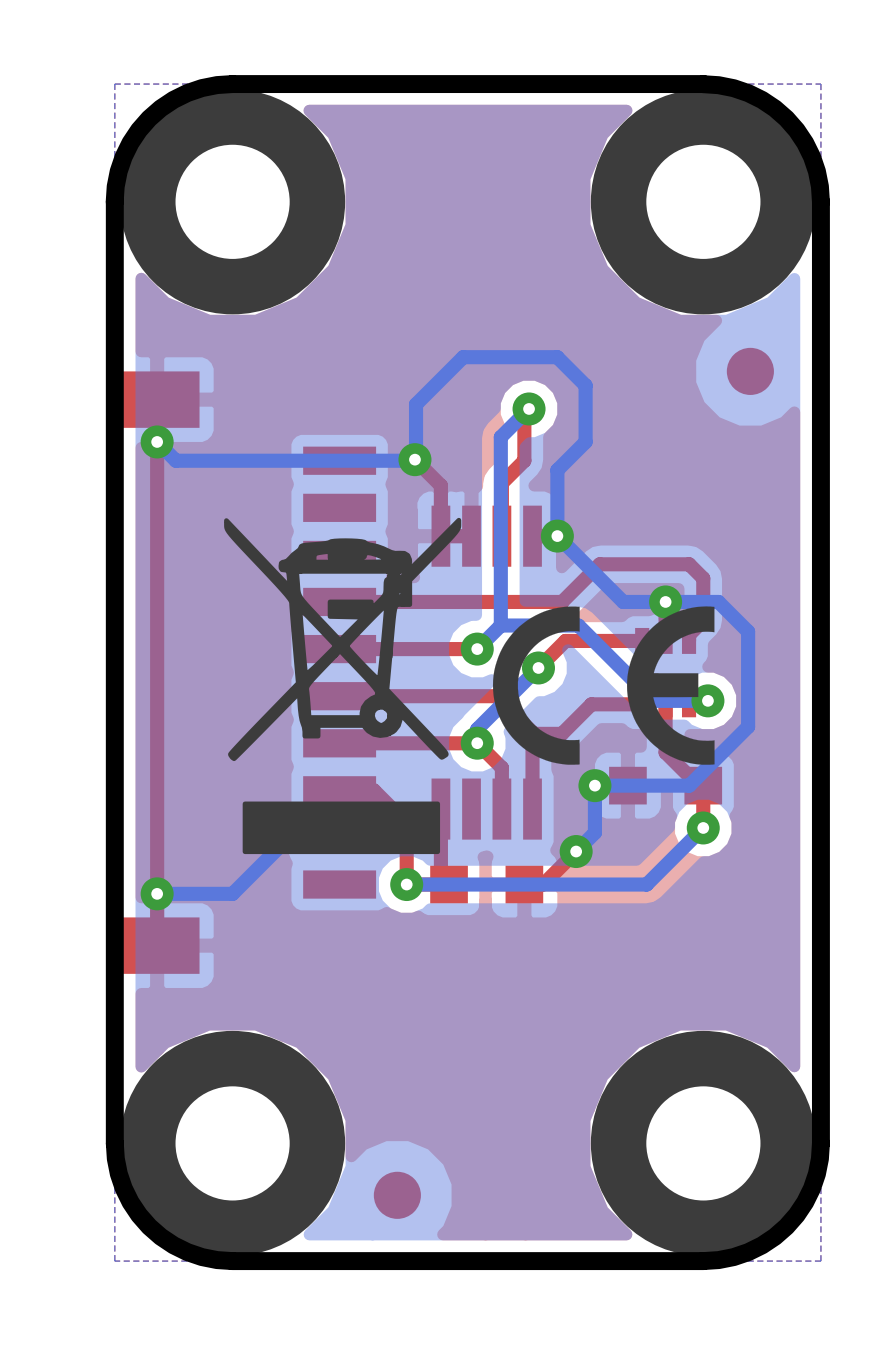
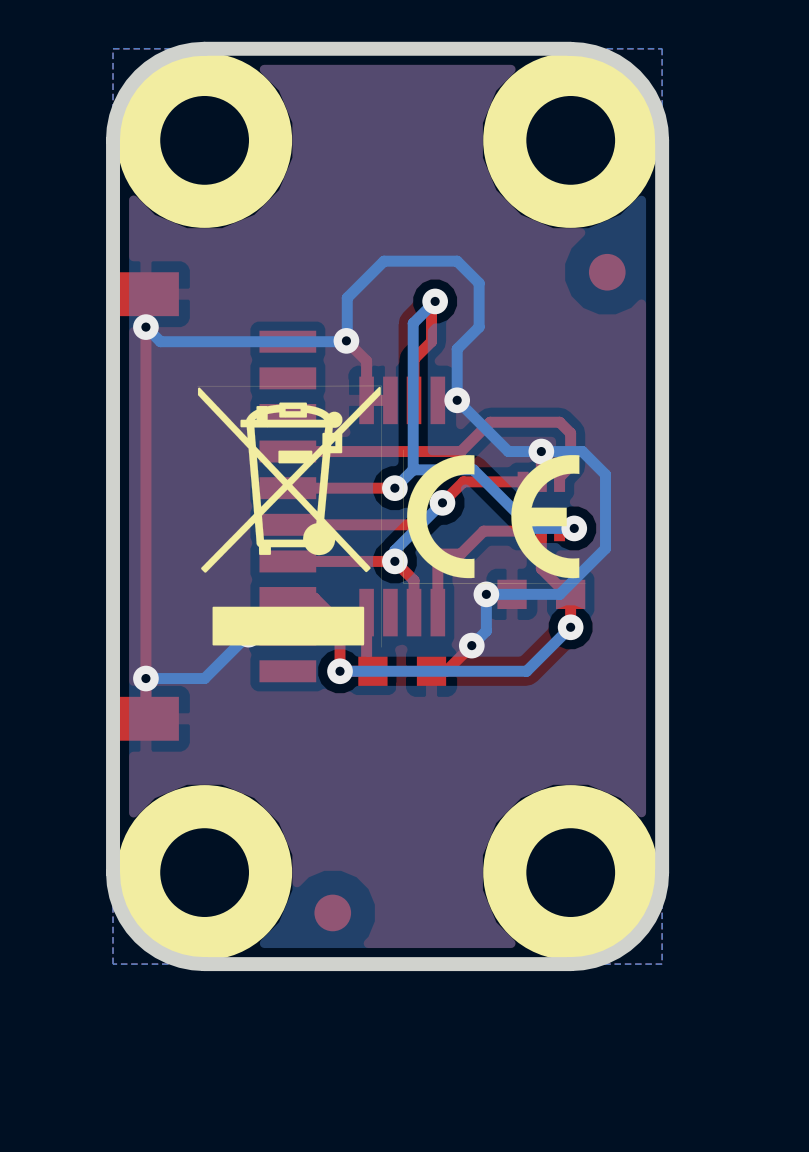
drawing shape: [224, 517, 462, 855] -> [197, 385, 382, 648]
drawing shape: [492, 606, 715, 765] -> [403, 449, 587, 584]

